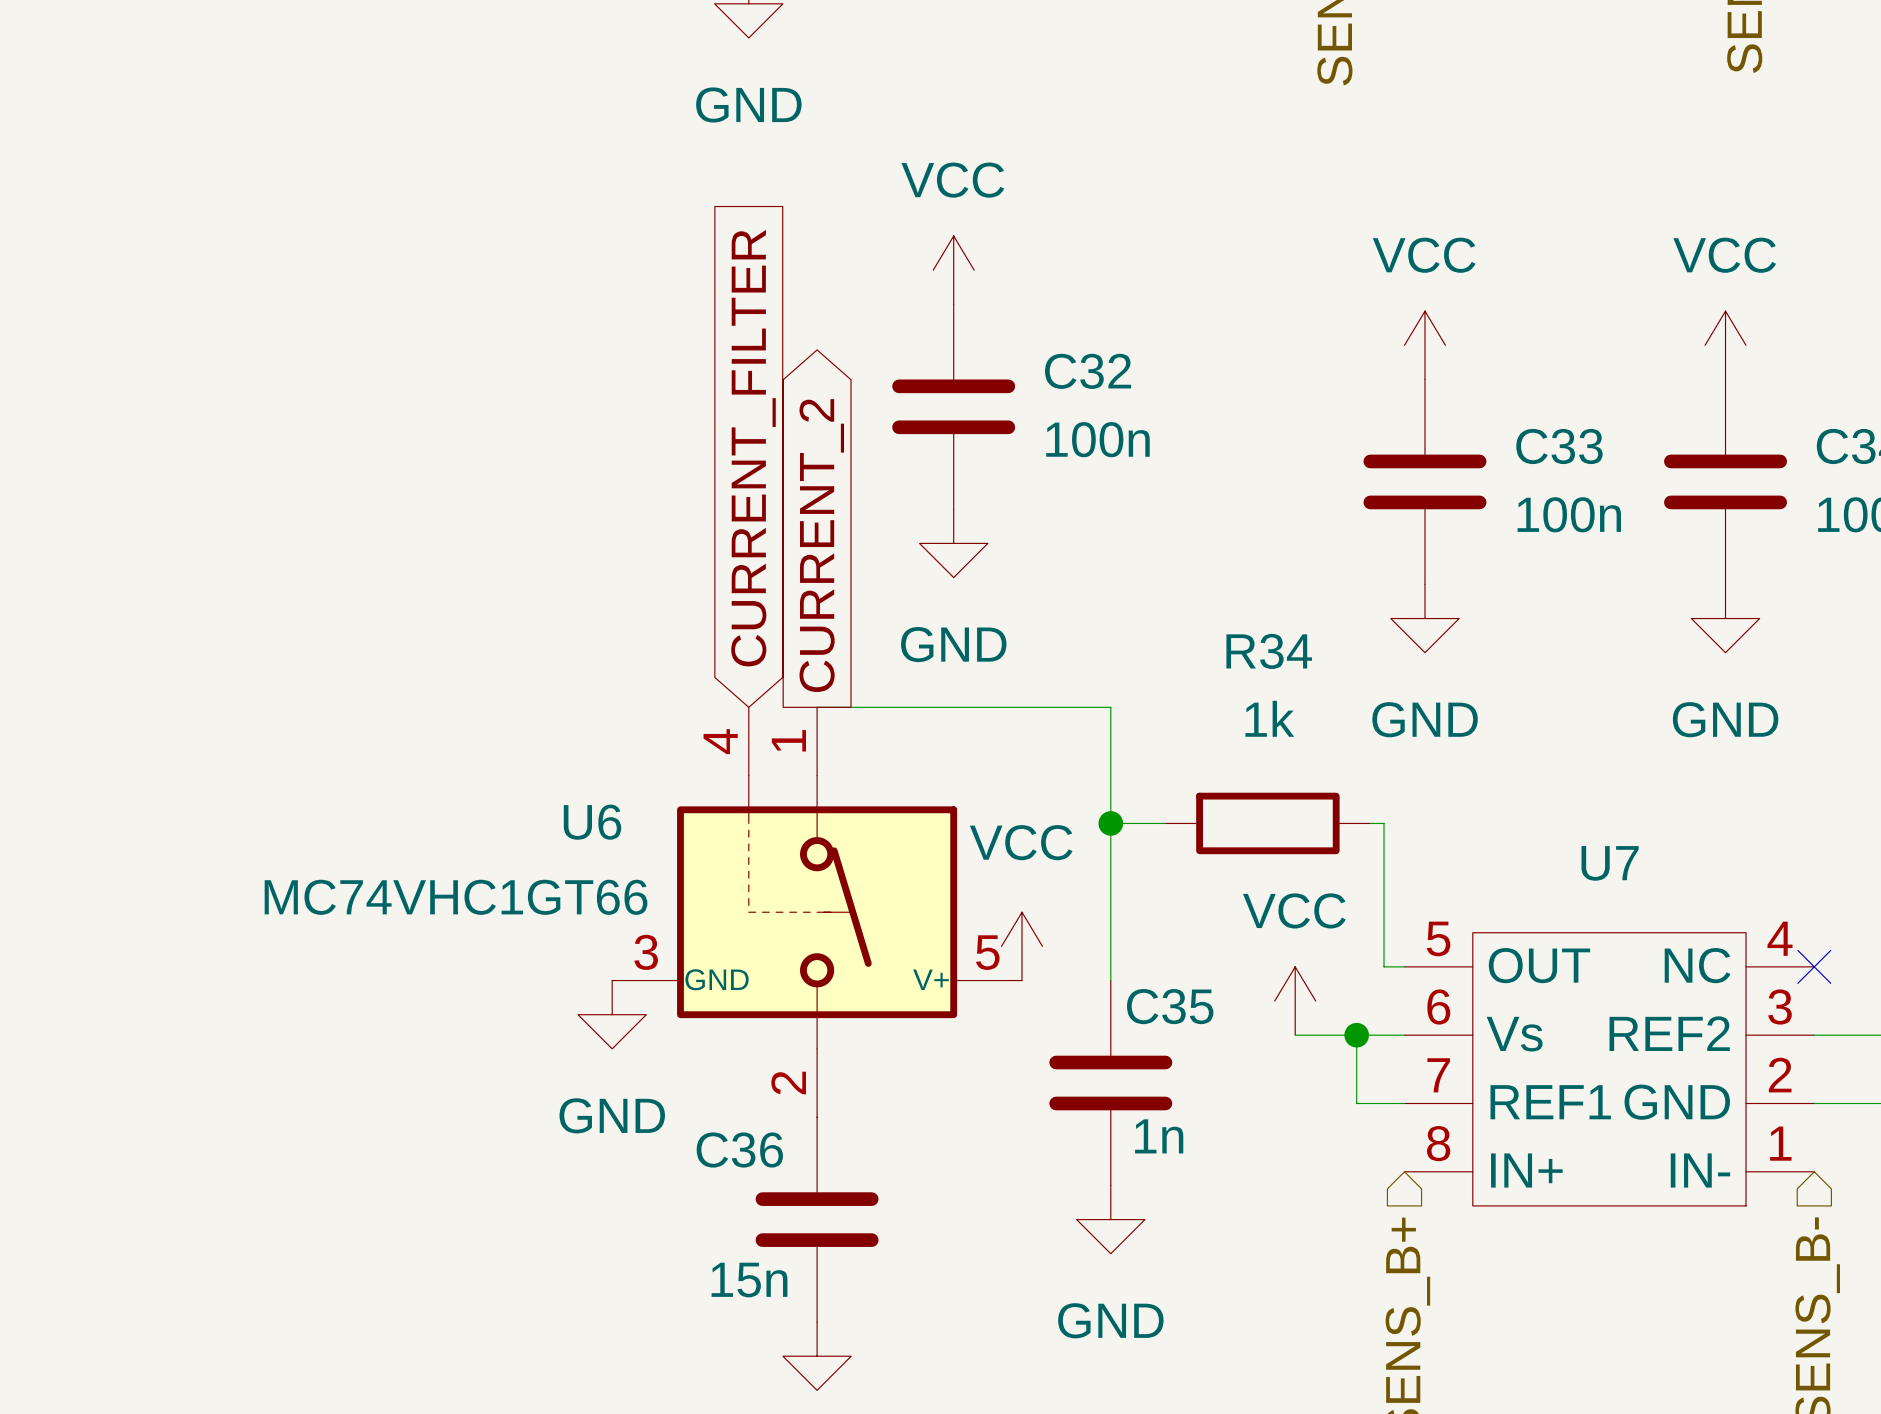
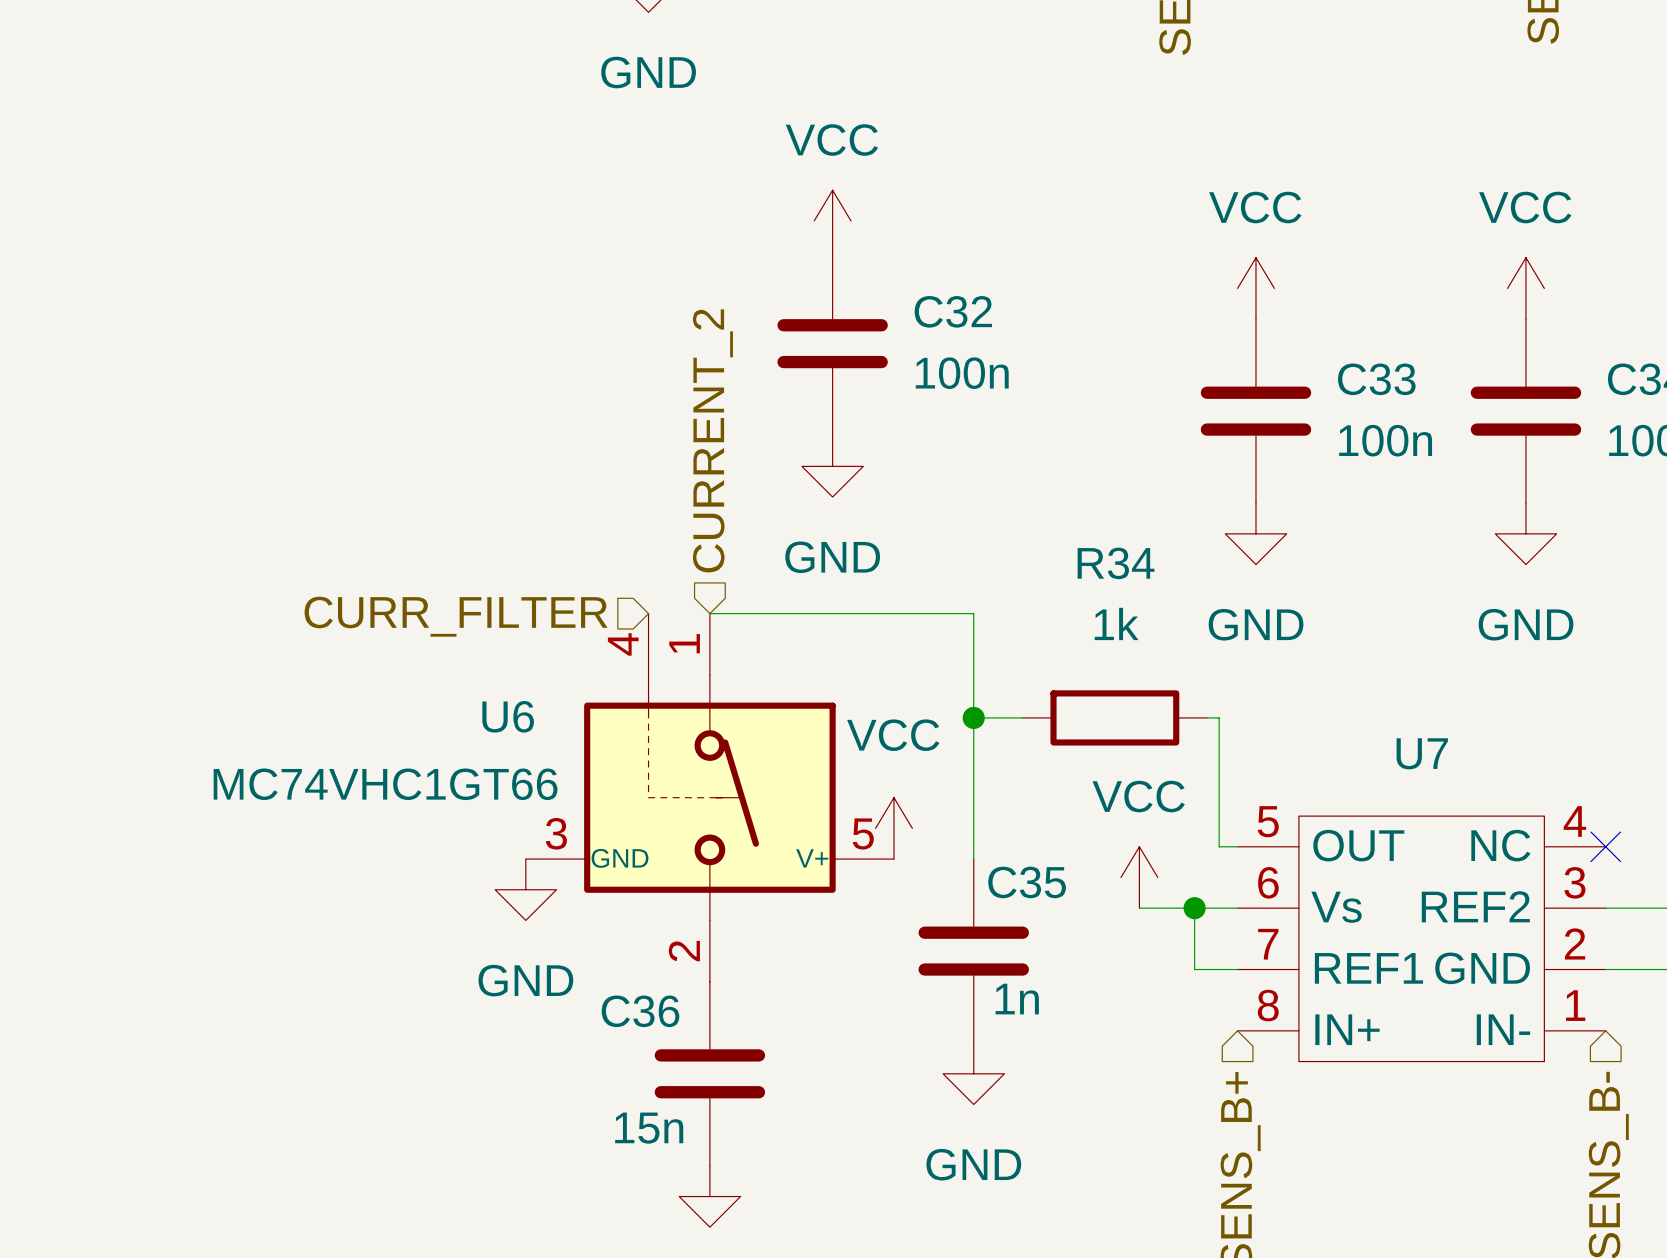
global label: CURRENT_FILTER (753, 448) -> none
hierarchical label: none -> CURRENT_2 (712, 440)
global label: CURRENT_2 (821, 545) -> none
hierarchical label: none -> CURR_FILTER (456, 616)

